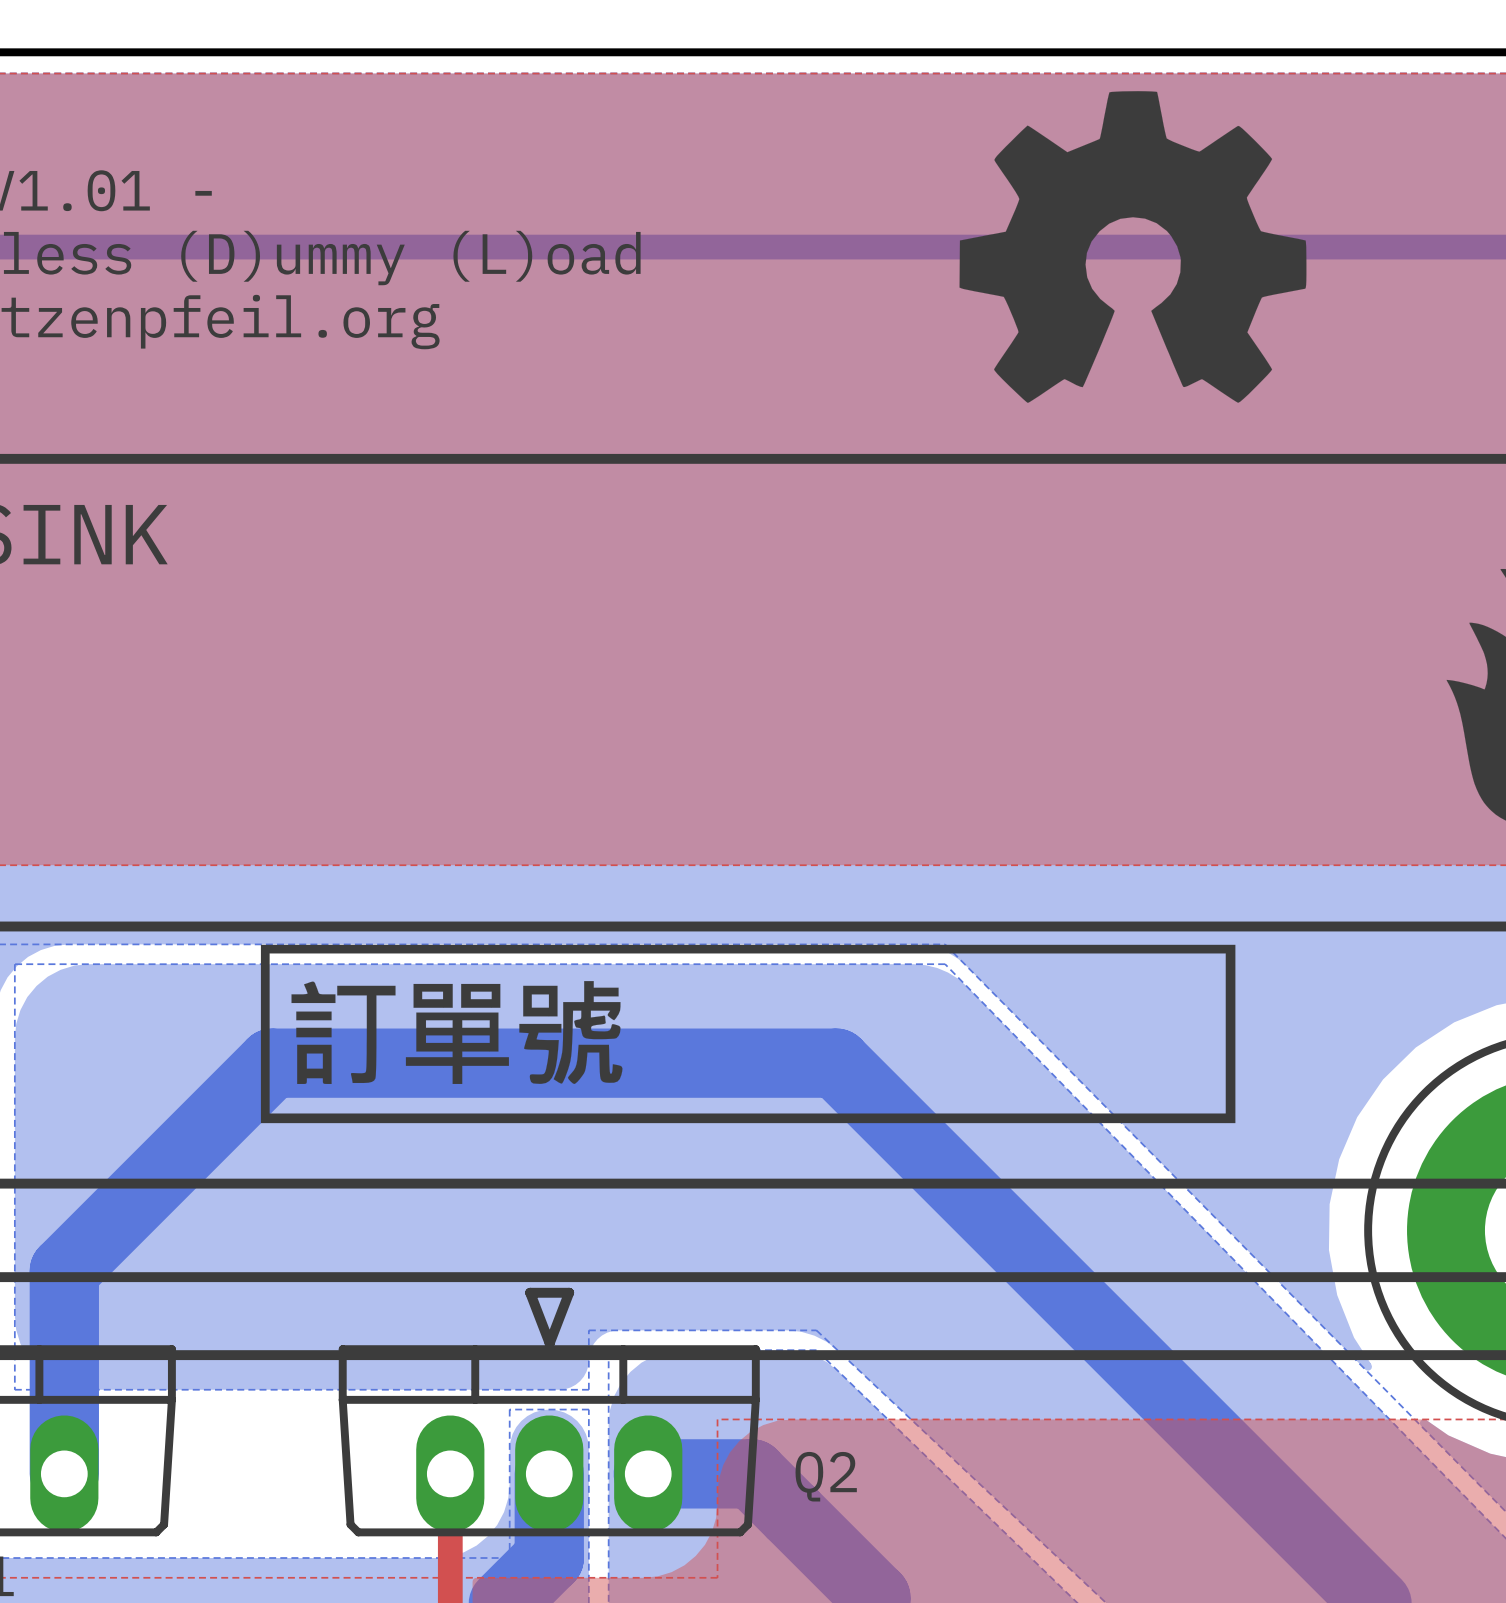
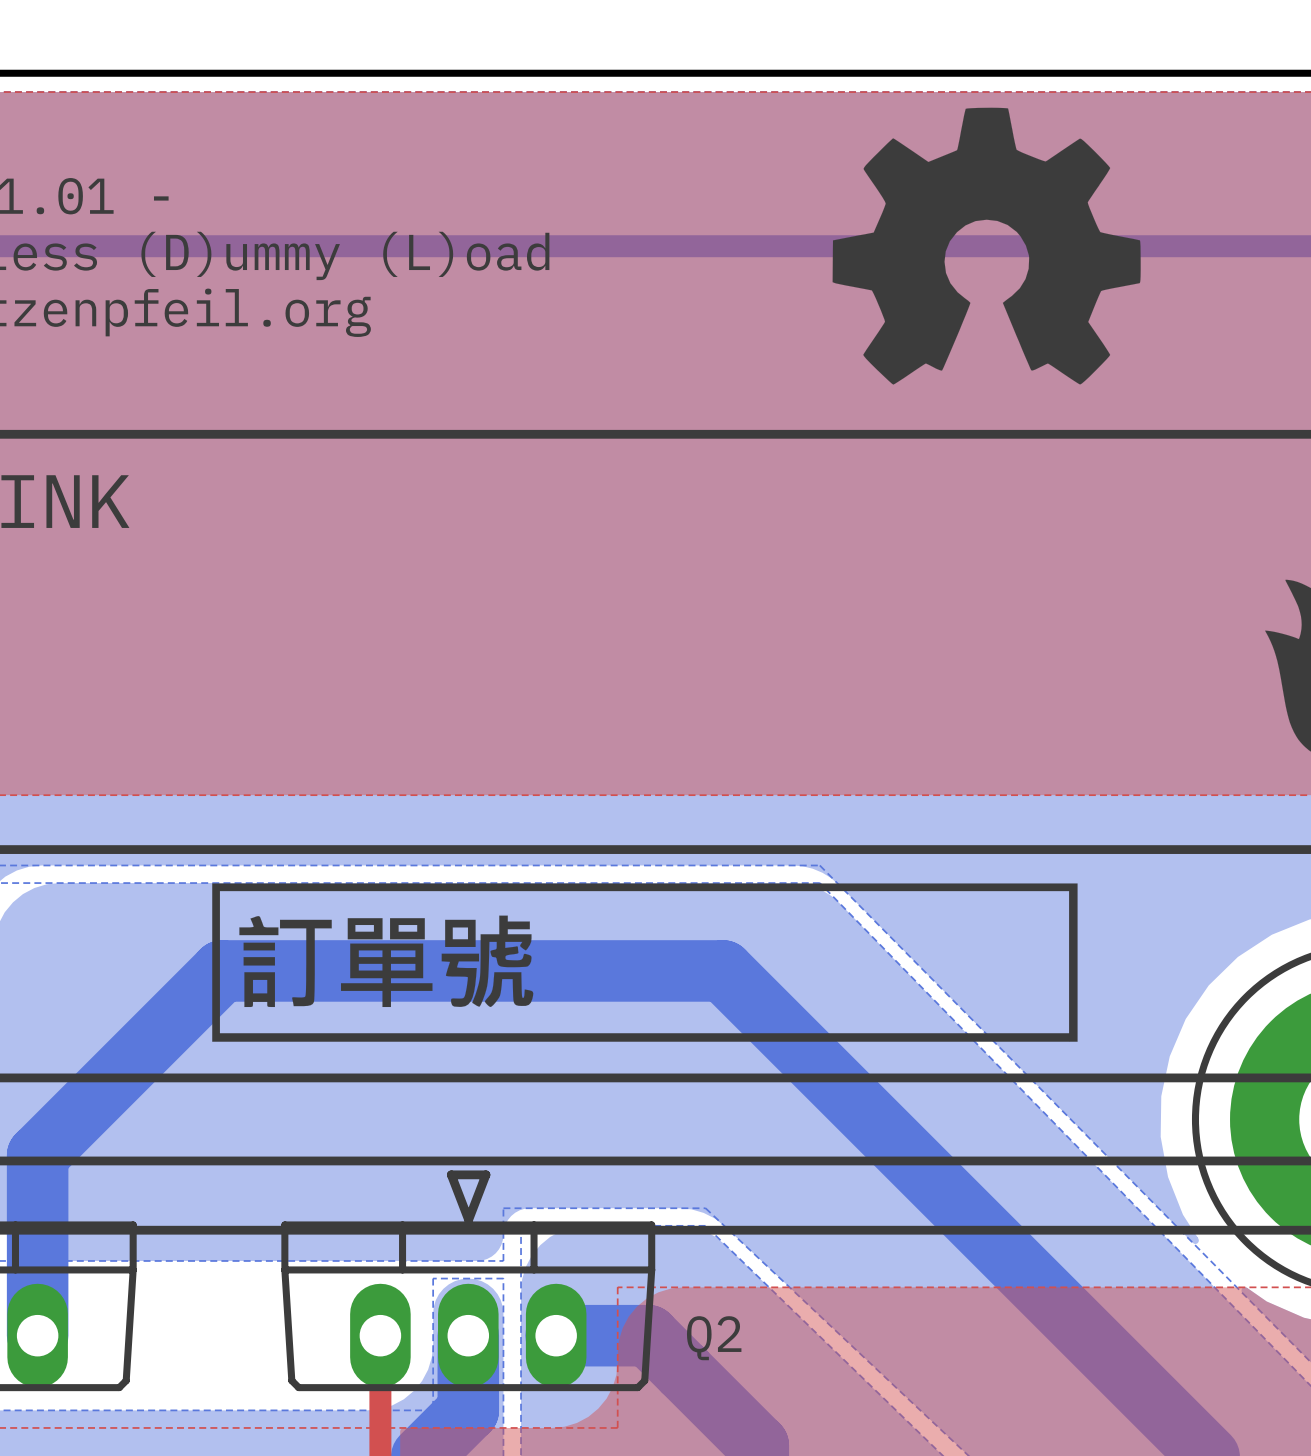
drawing position: (748, 1033) -> (644, 962)

